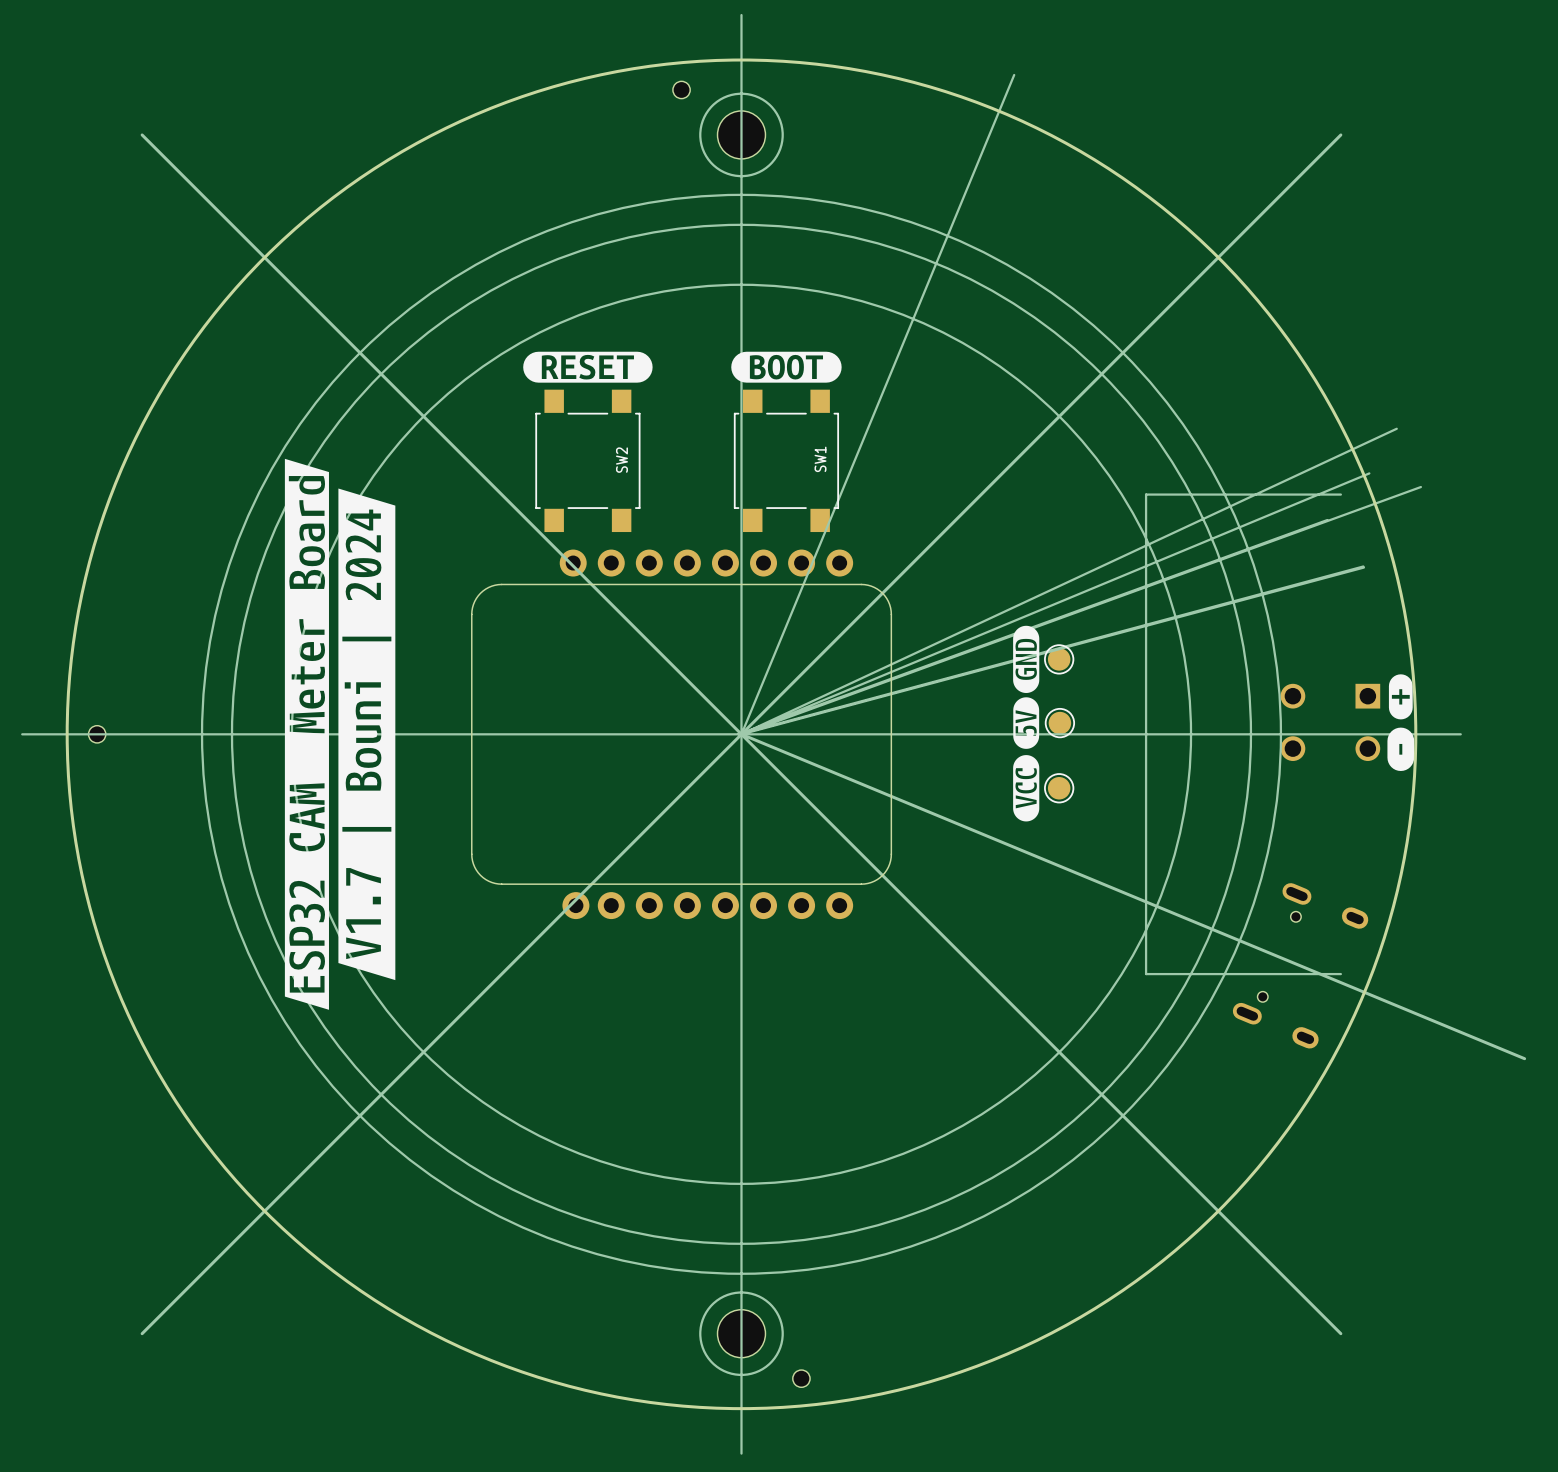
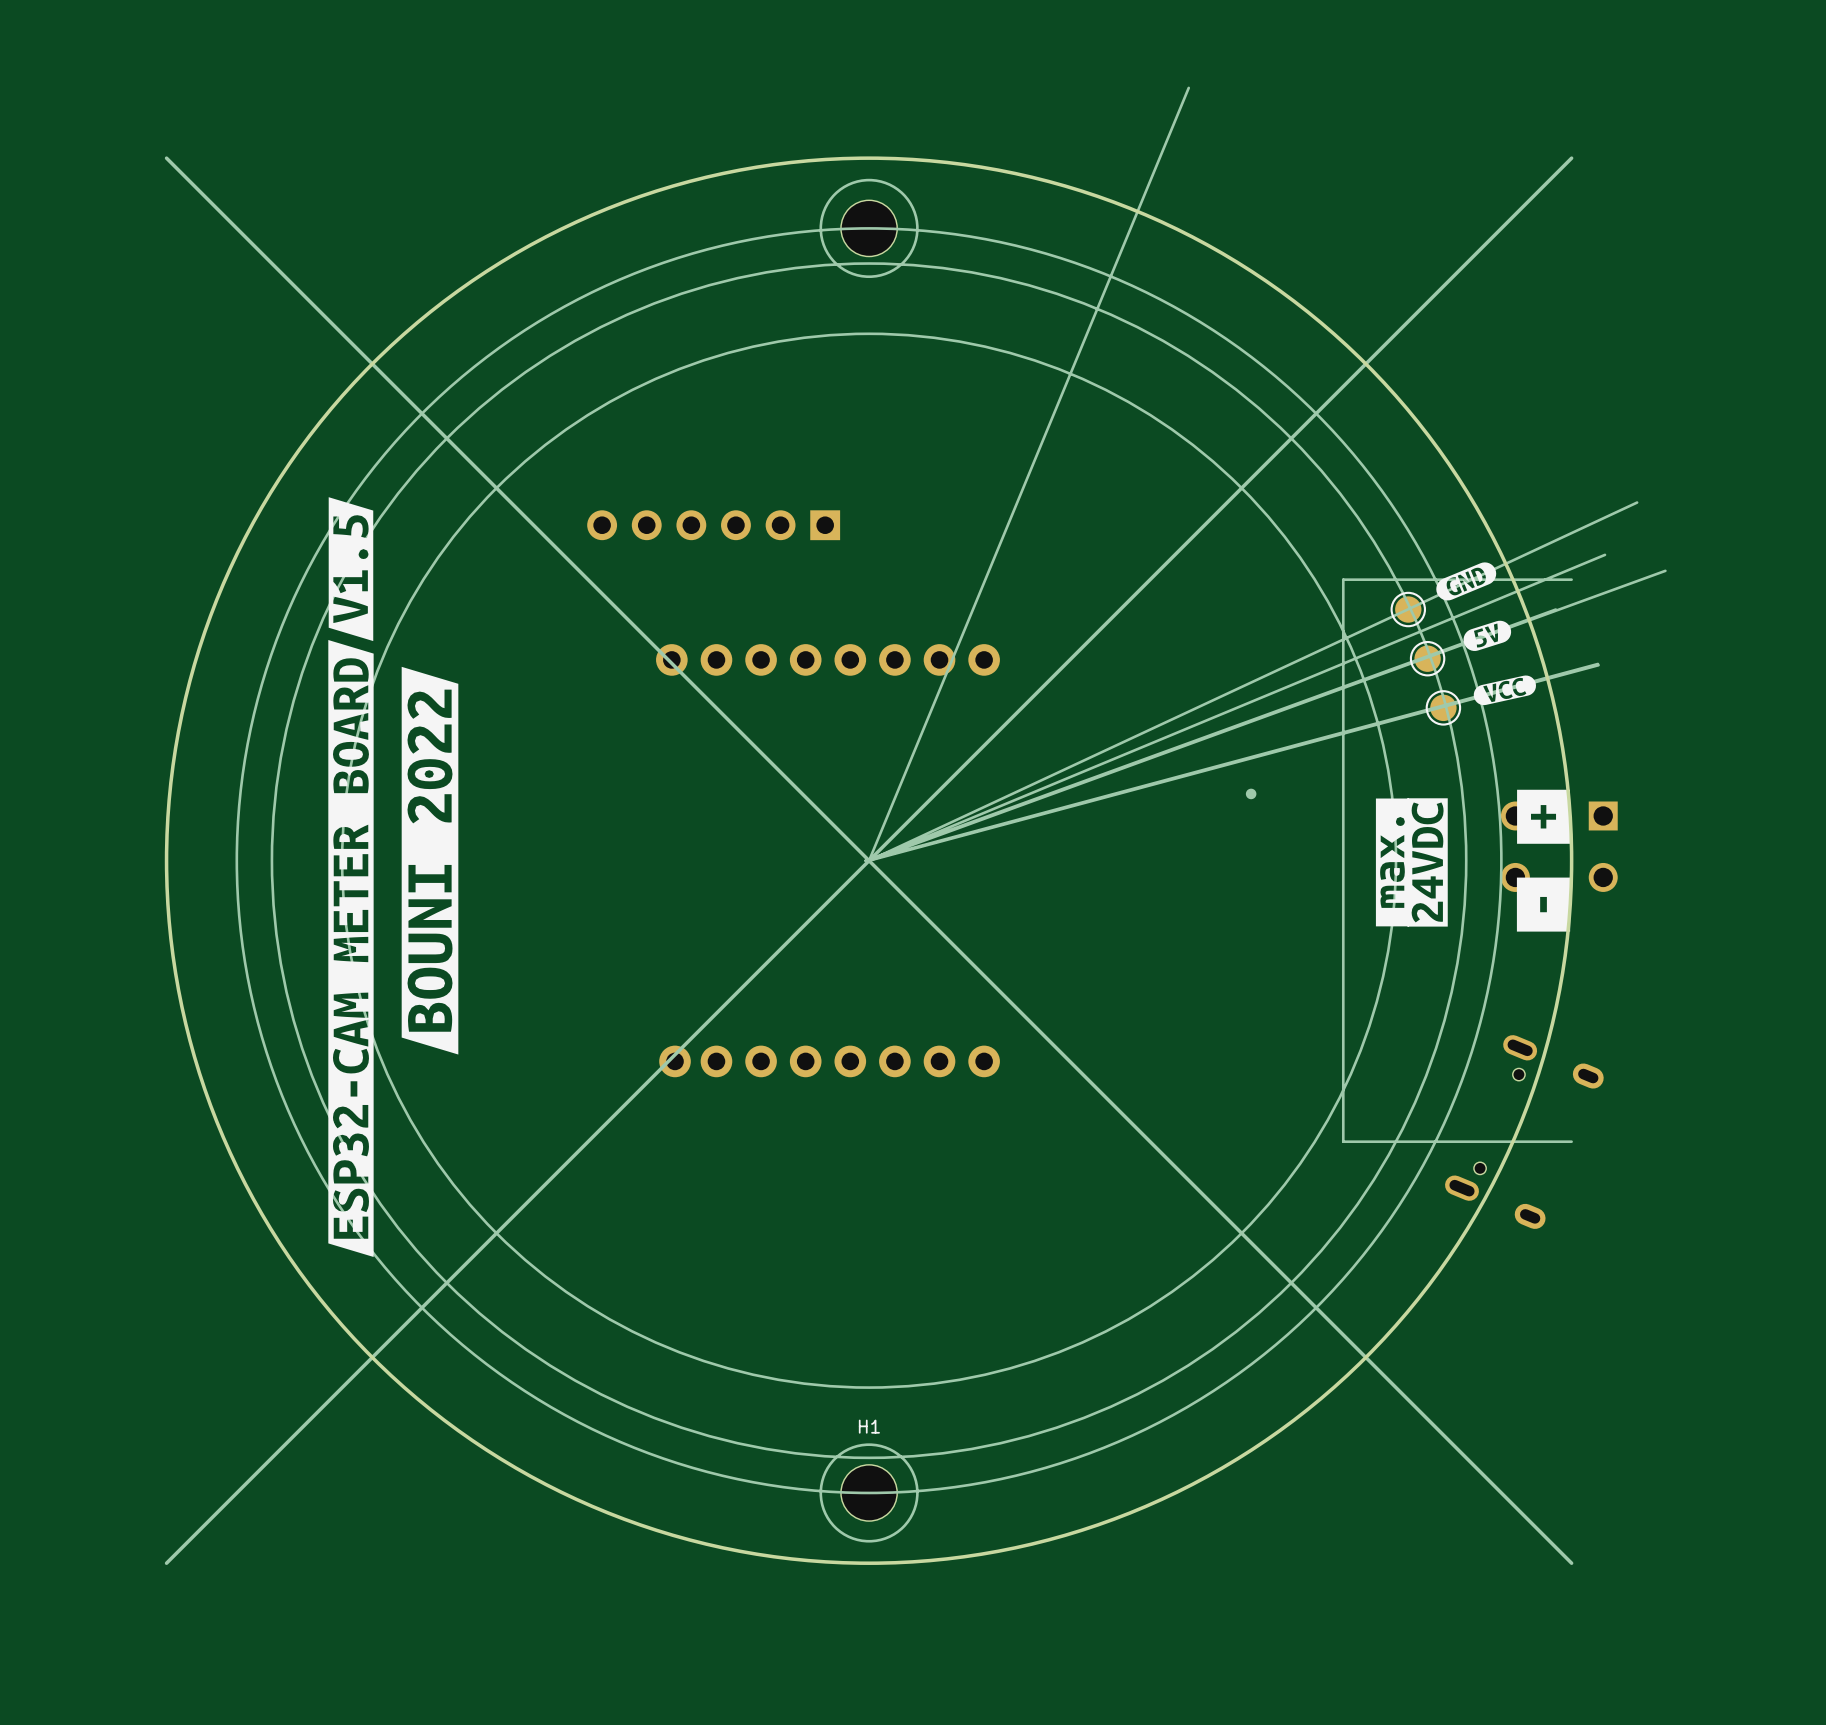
line: (741, 15) (741, 1453) -> none
round board edge size: [65, 58, 1418, 1411] -> [164, 156, 1574, 1565]
part: (681, 89) -> none
part position: (741, 134) -> (869, 228)
drawing: [523, 351, 653, 383] -> none
drawing: [731, 351, 842, 383] -> none
drawing: none -> [328, 497, 374, 1257]
part: none -> (713, 525)
drawing: [284, 458, 329, 1010] -> none
SW2: (587, 460) -> none
SW1: (786, 460) -> none
drawing: none -> [1436, 562, 1512, 651]
drawing shape: [338, 488, 396, 981] -> [401, 666, 459, 1055]
part: none -> (1408, 609)
part: none -> (1427, 658)
drawing: none -> [1473, 675, 1536, 706]
board edge: (501, 584) (861, 584) (871, 586) (880, 591) (888, 601) (891, 614) (891, 854) (889, 864) (884, 872) (874, 881) (861, 884) (501, 884) (491, 882) (483, 877) (474, 867) (471, 854) (471, 611) (474, 601) (480, 593) (488, 587) (501, 584) -> none
part: none -> (1443, 707)
drawing: [1013, 625, 1040, 822] -> none
part: (1059, 659) -> none
drawing: none -> [1517, 789, 1570, 844]
drawing: [1387, 674, 1415, 772] -> none
part: none -> (1251, 793)
drawing: none -> [1375, 798, 1448, 927]
part: (1059, 723) -> none
line: (22, 734) (1460, 734) -> none
part: (97, 734) -> none
line: (741, 734) (1524, 1058) -> none
drawing: none -> [1516, 877, 1571, 932]
part: (1059, 788) -> none
H1: none -> (869, 1492)
part: (741, 1333) -> none
part: (801, 1378) -> none

